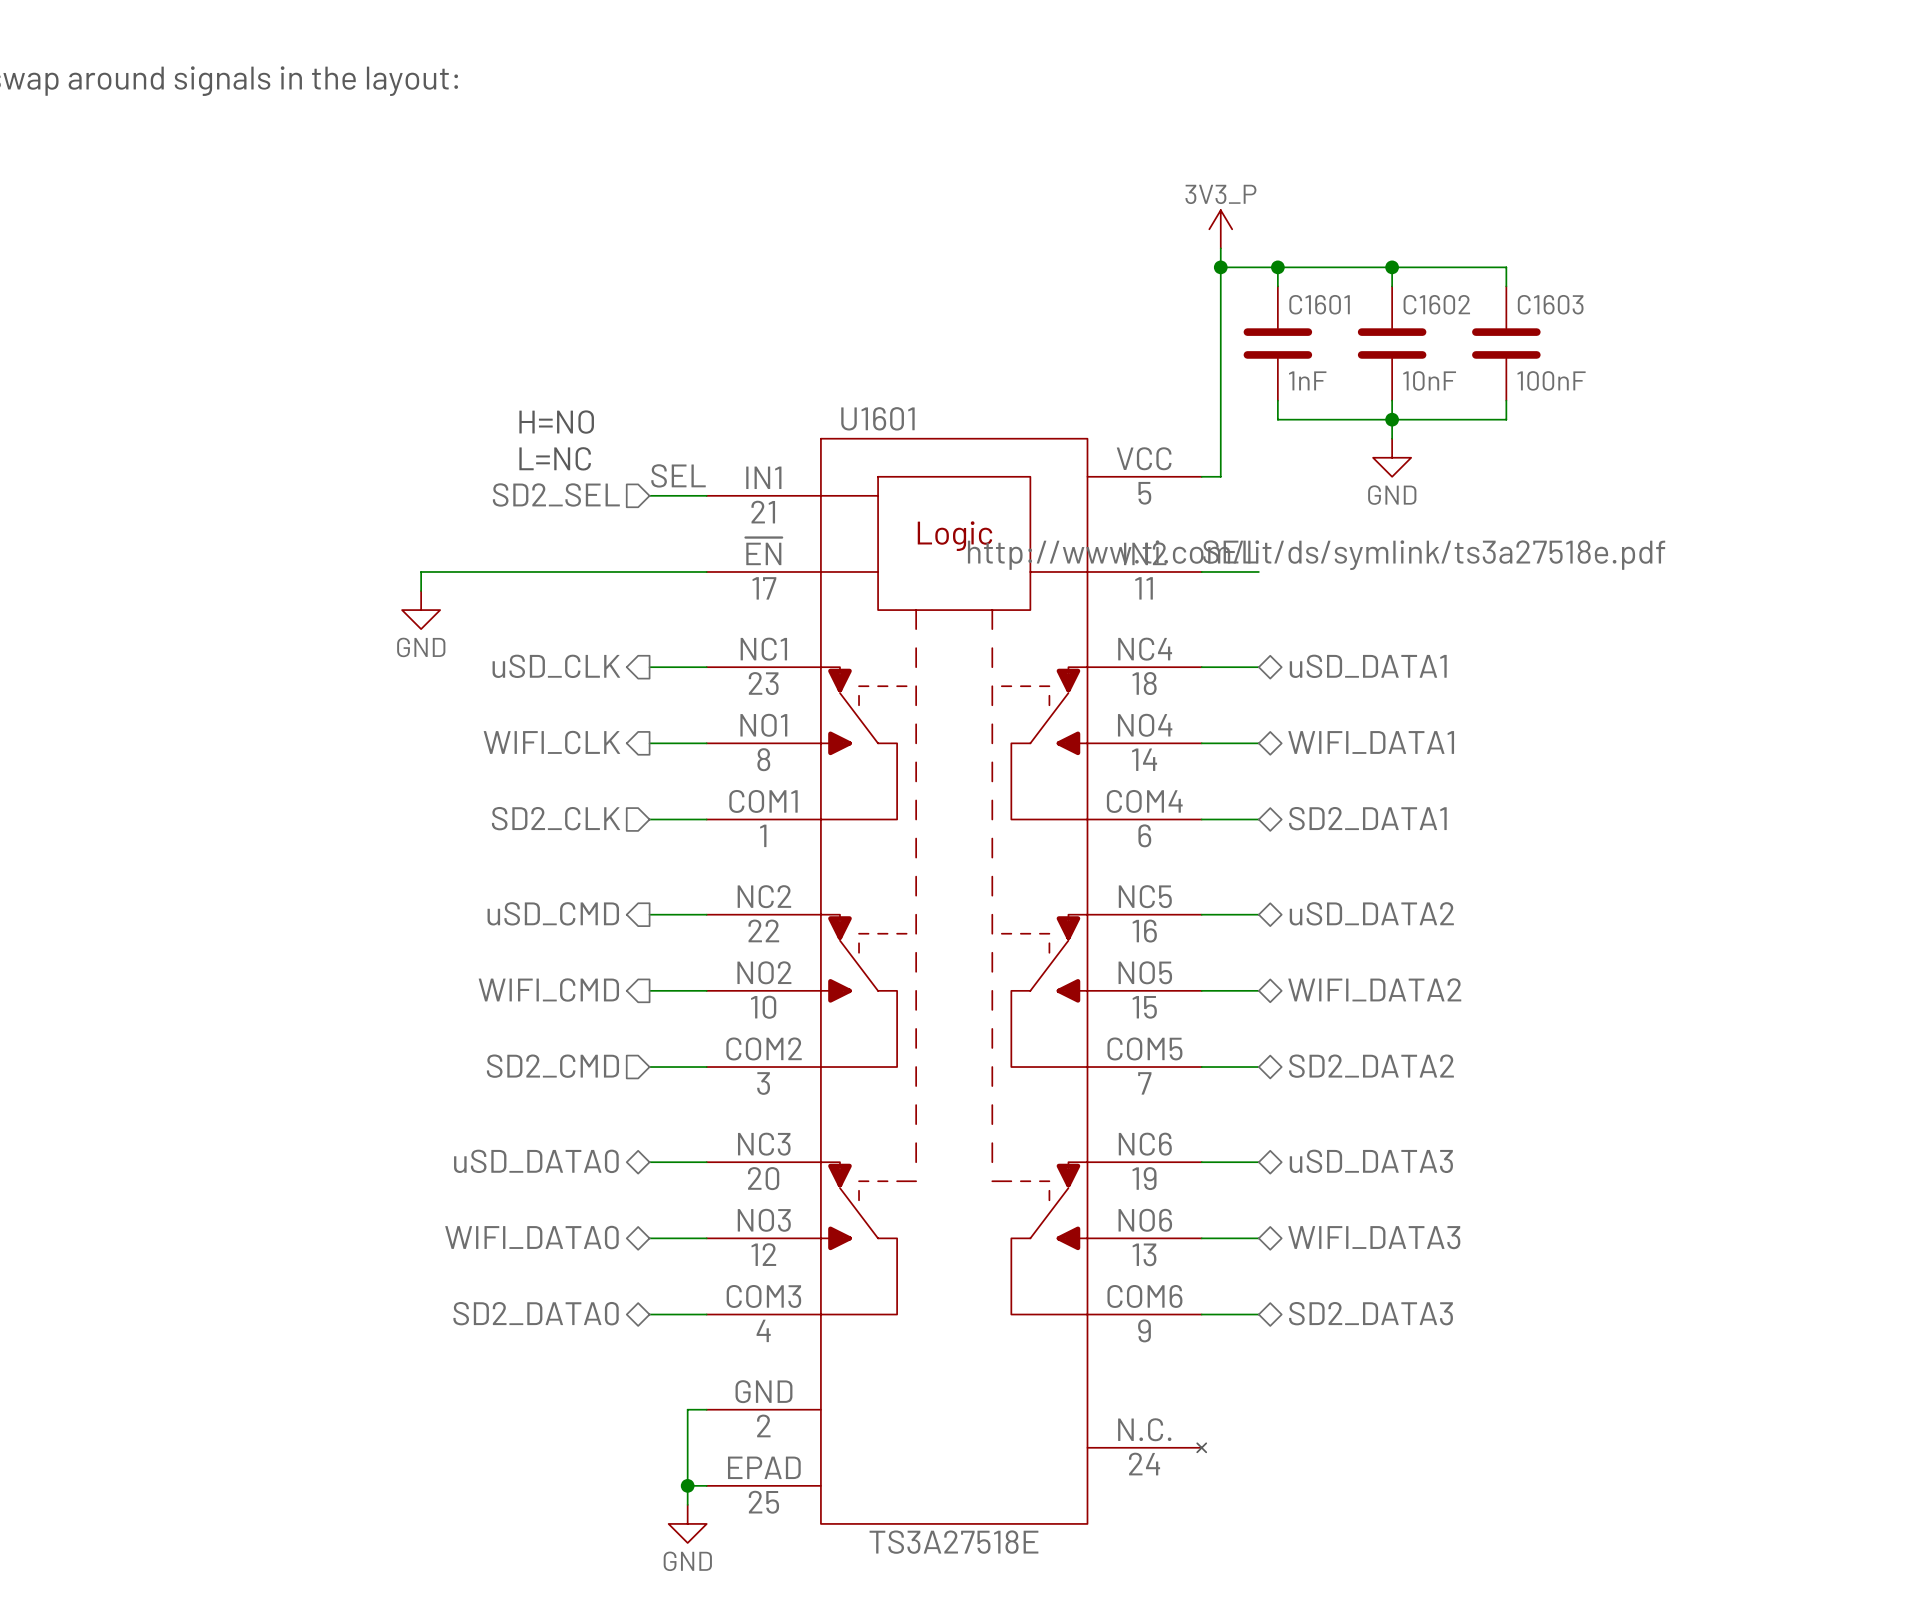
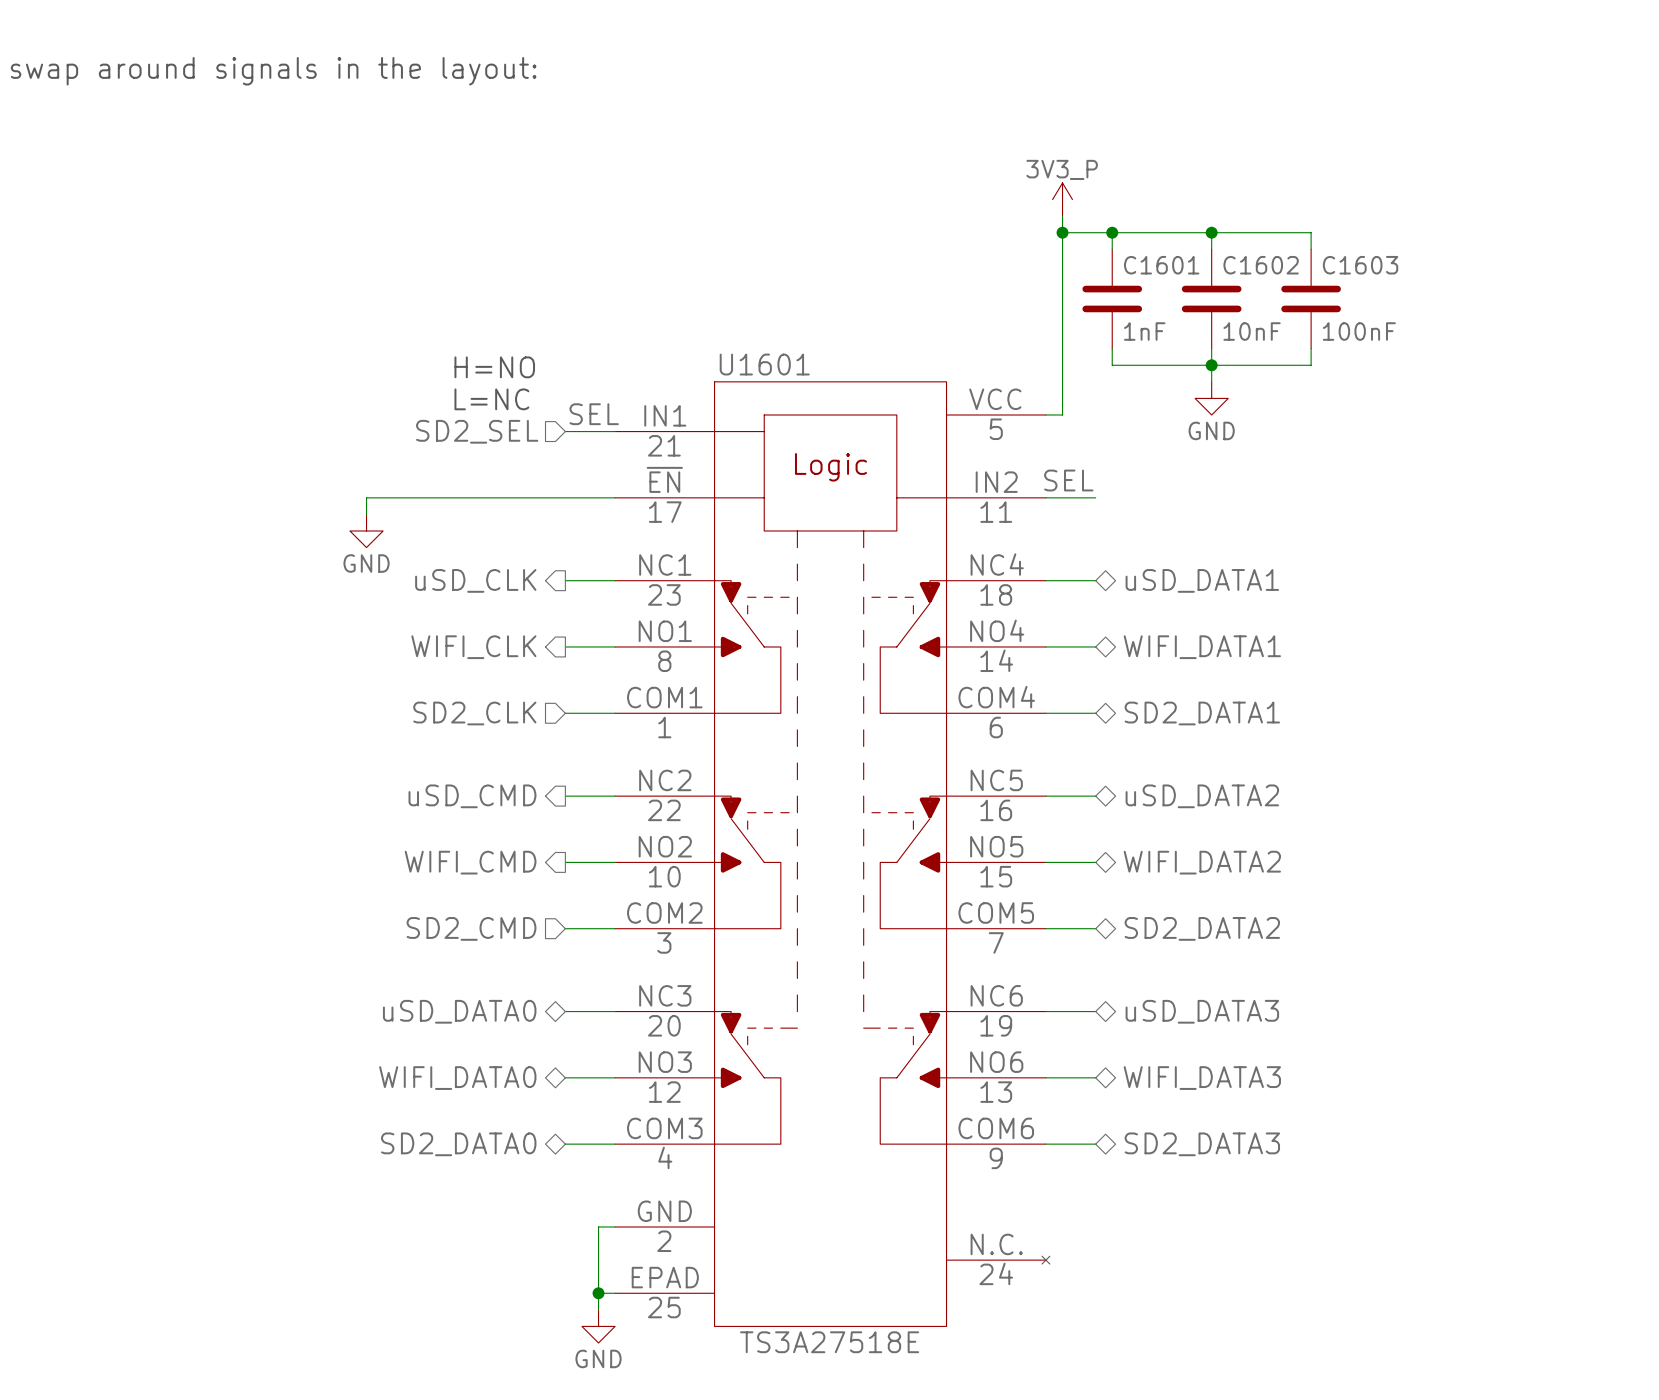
U1601 text: http://www.ti.com/lit/ds/symlink/ts3a27518e.pdf (1316, 555) -> none

